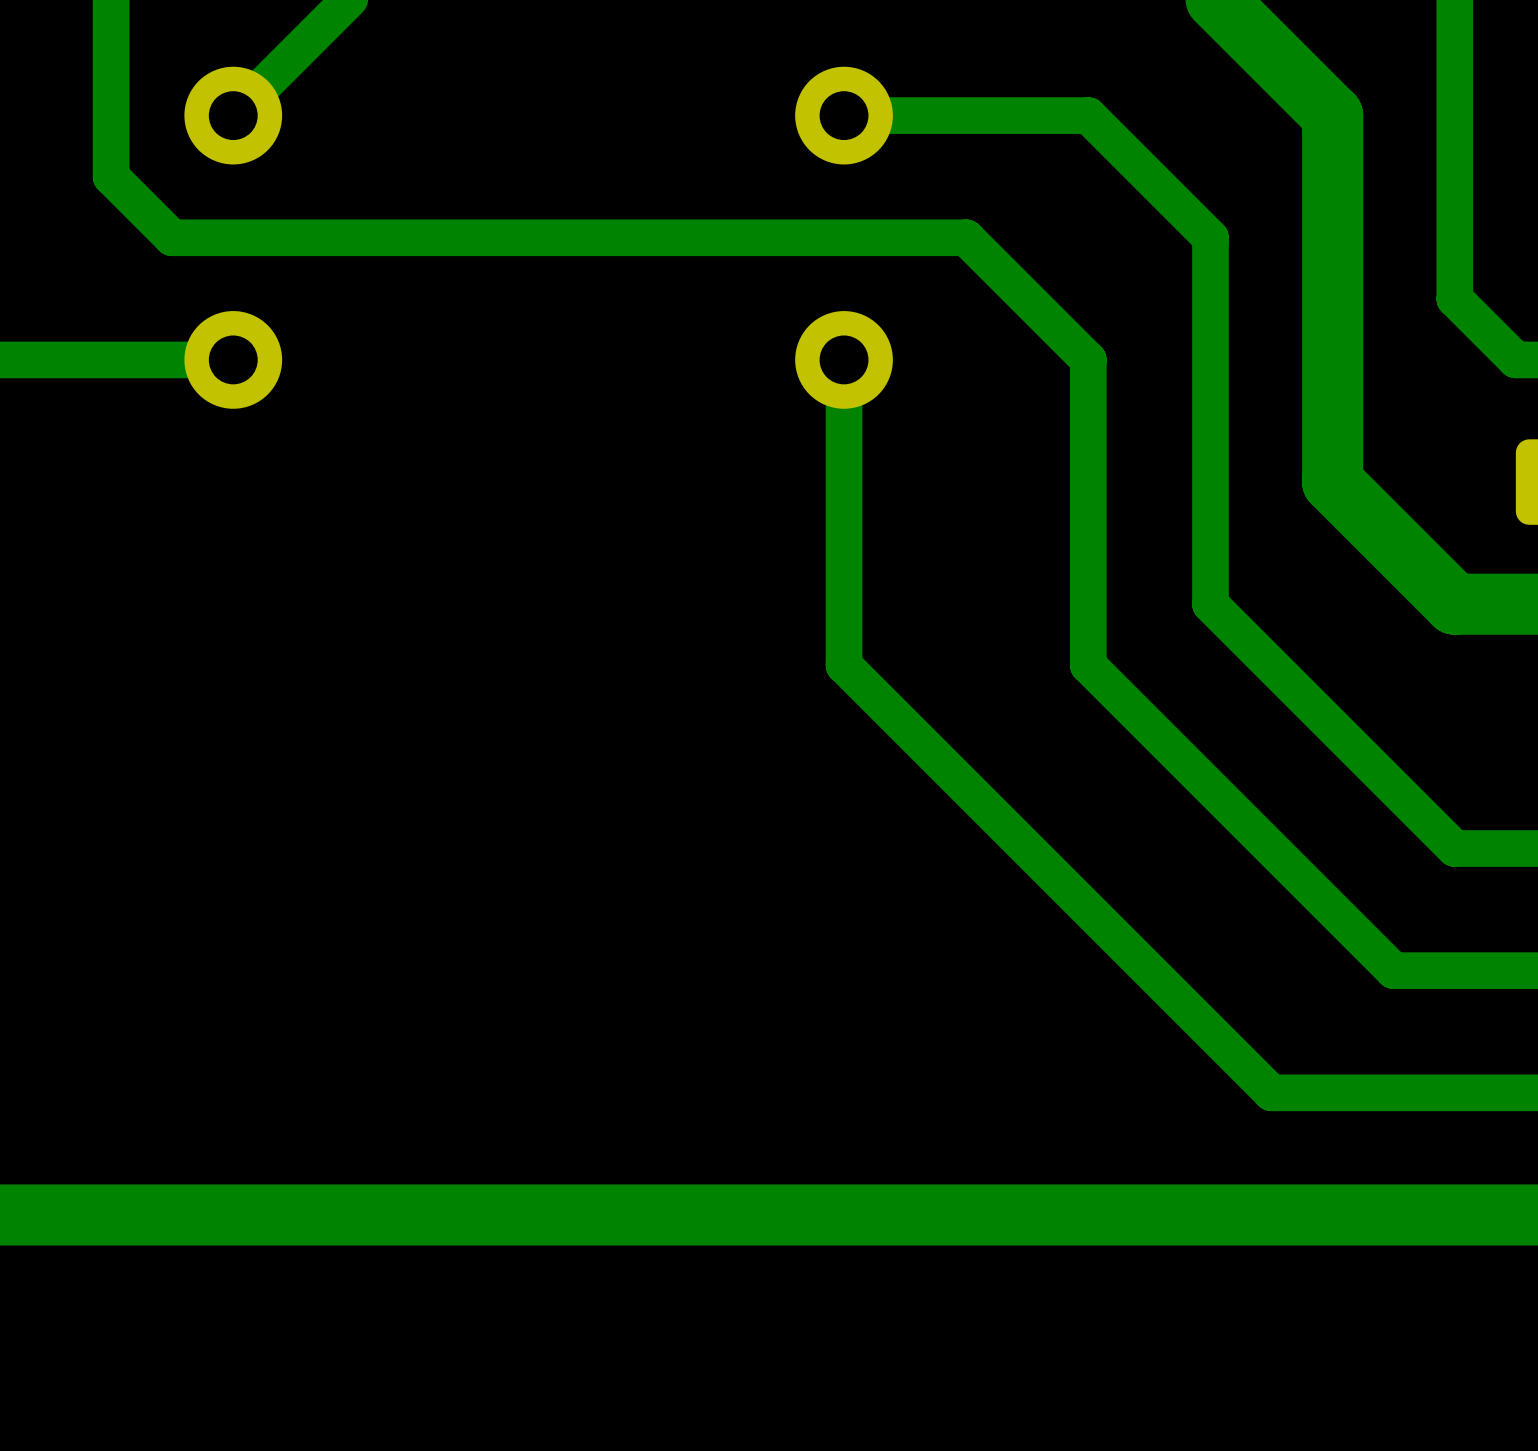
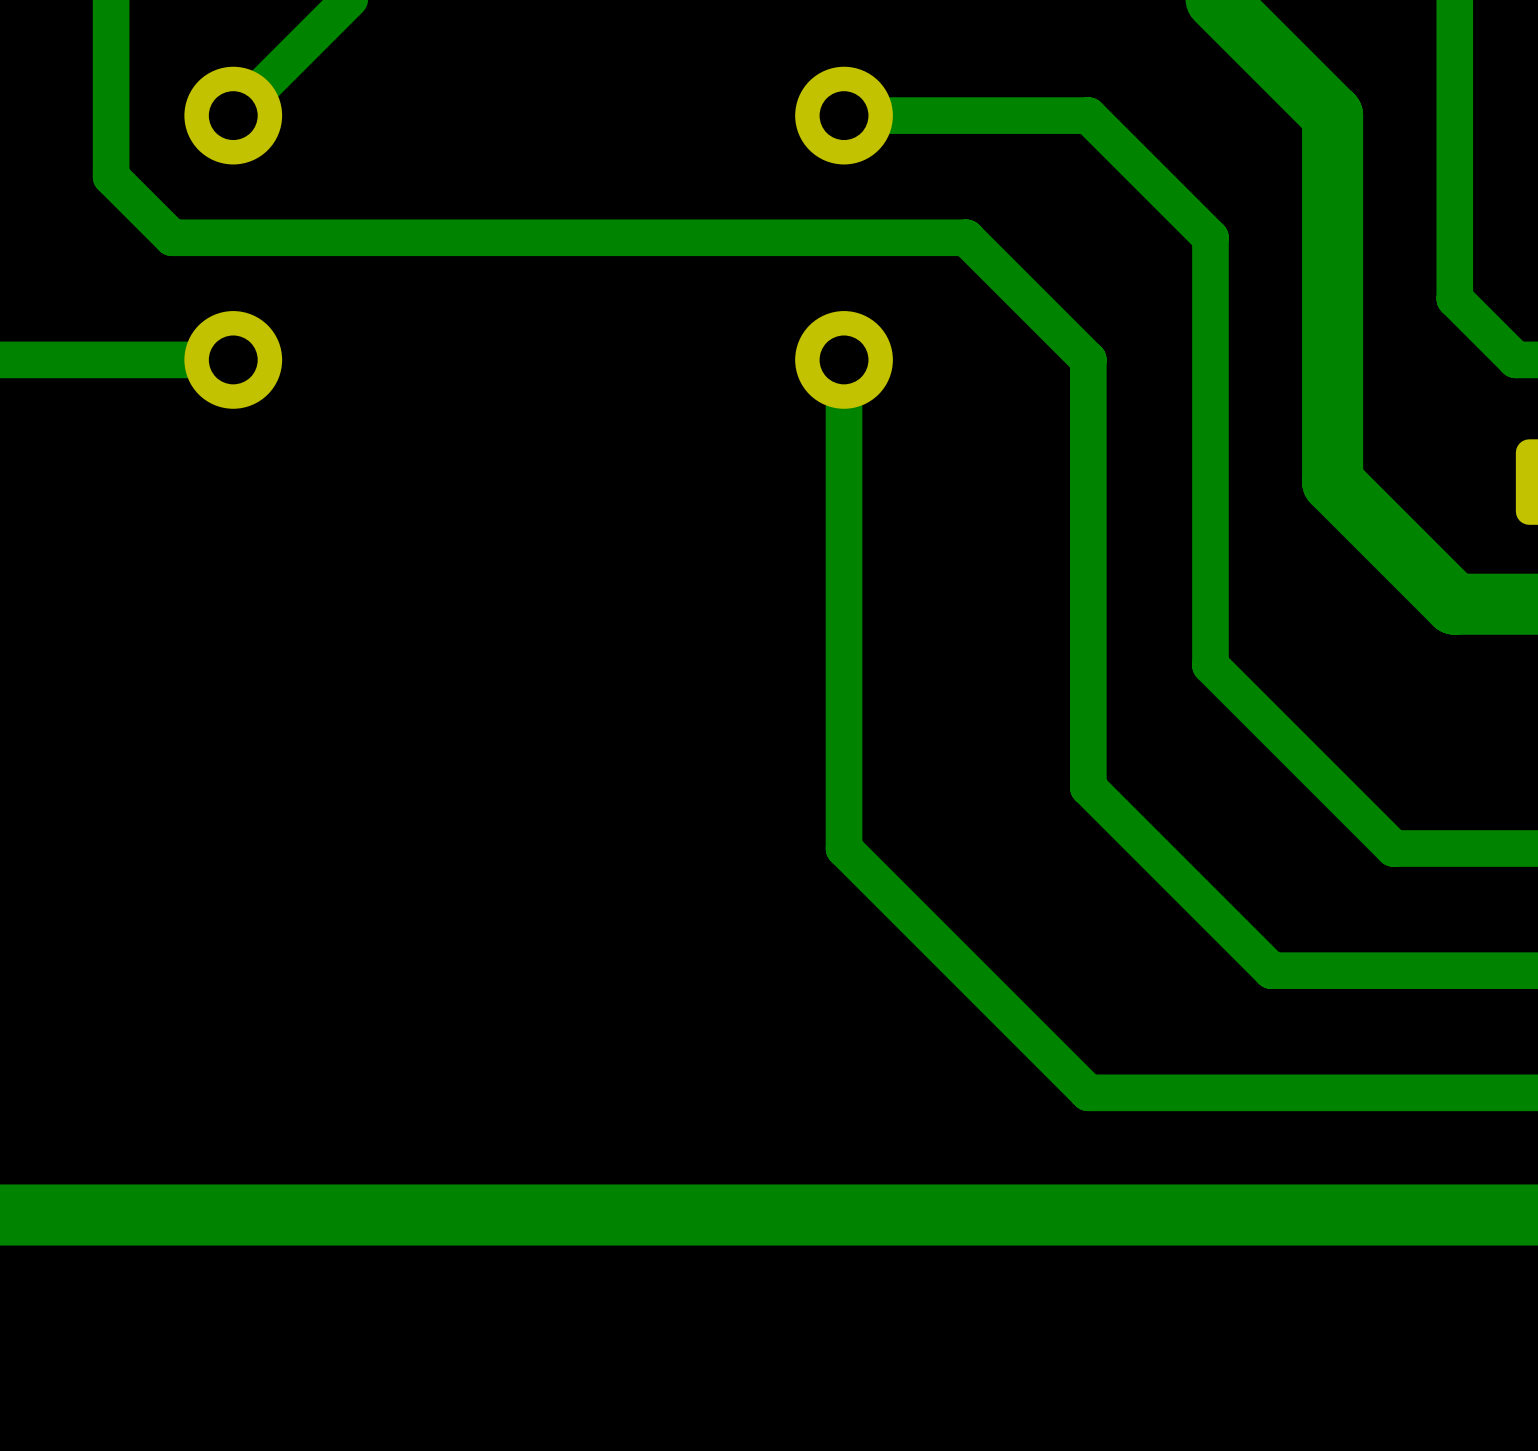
track: (1210, 604) (1454, 848) -> (1210, 604) (1210, 665) (1393, 848) (1454, 848)
track: (844, 665) (1271, 1092) -> (844, 665) (844, 848) (1088, 1092) (1271, 1092)
track: (1088, 665) (1393, 970) -> (1088, 665) (1088, 787) (1271, 970) (1393, 970)

